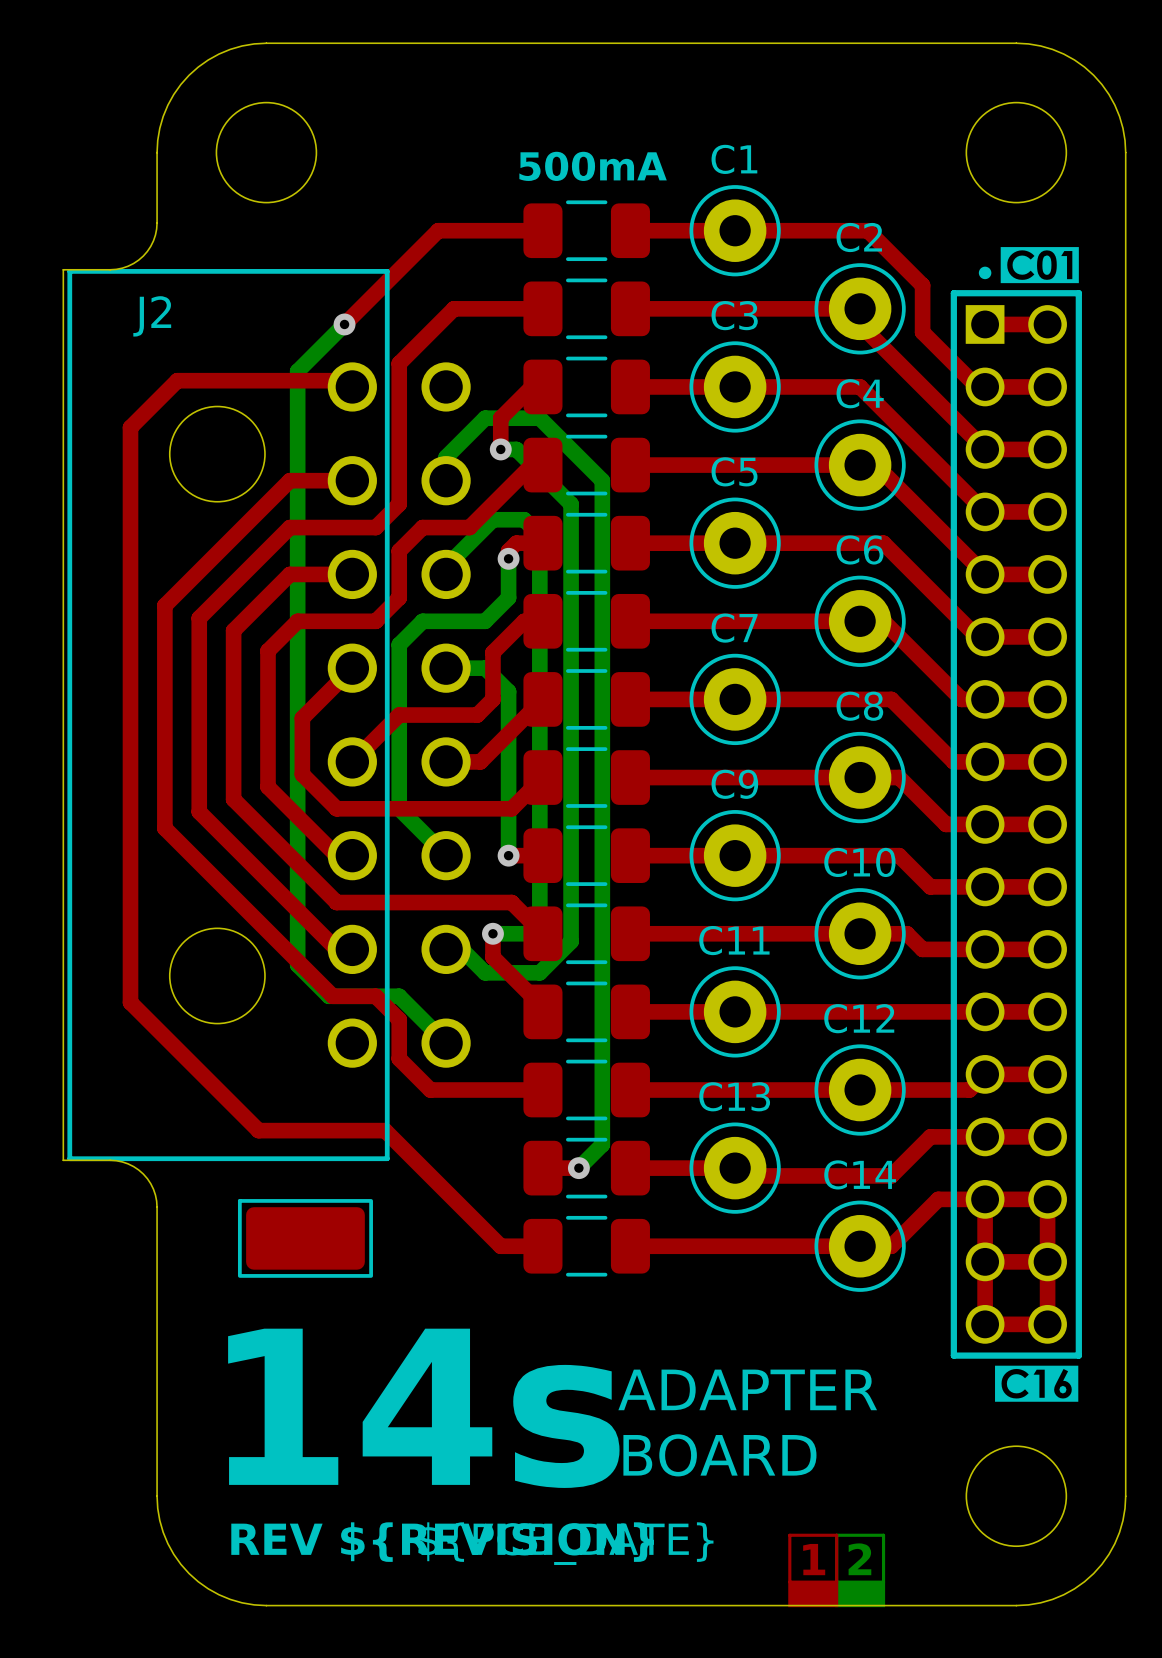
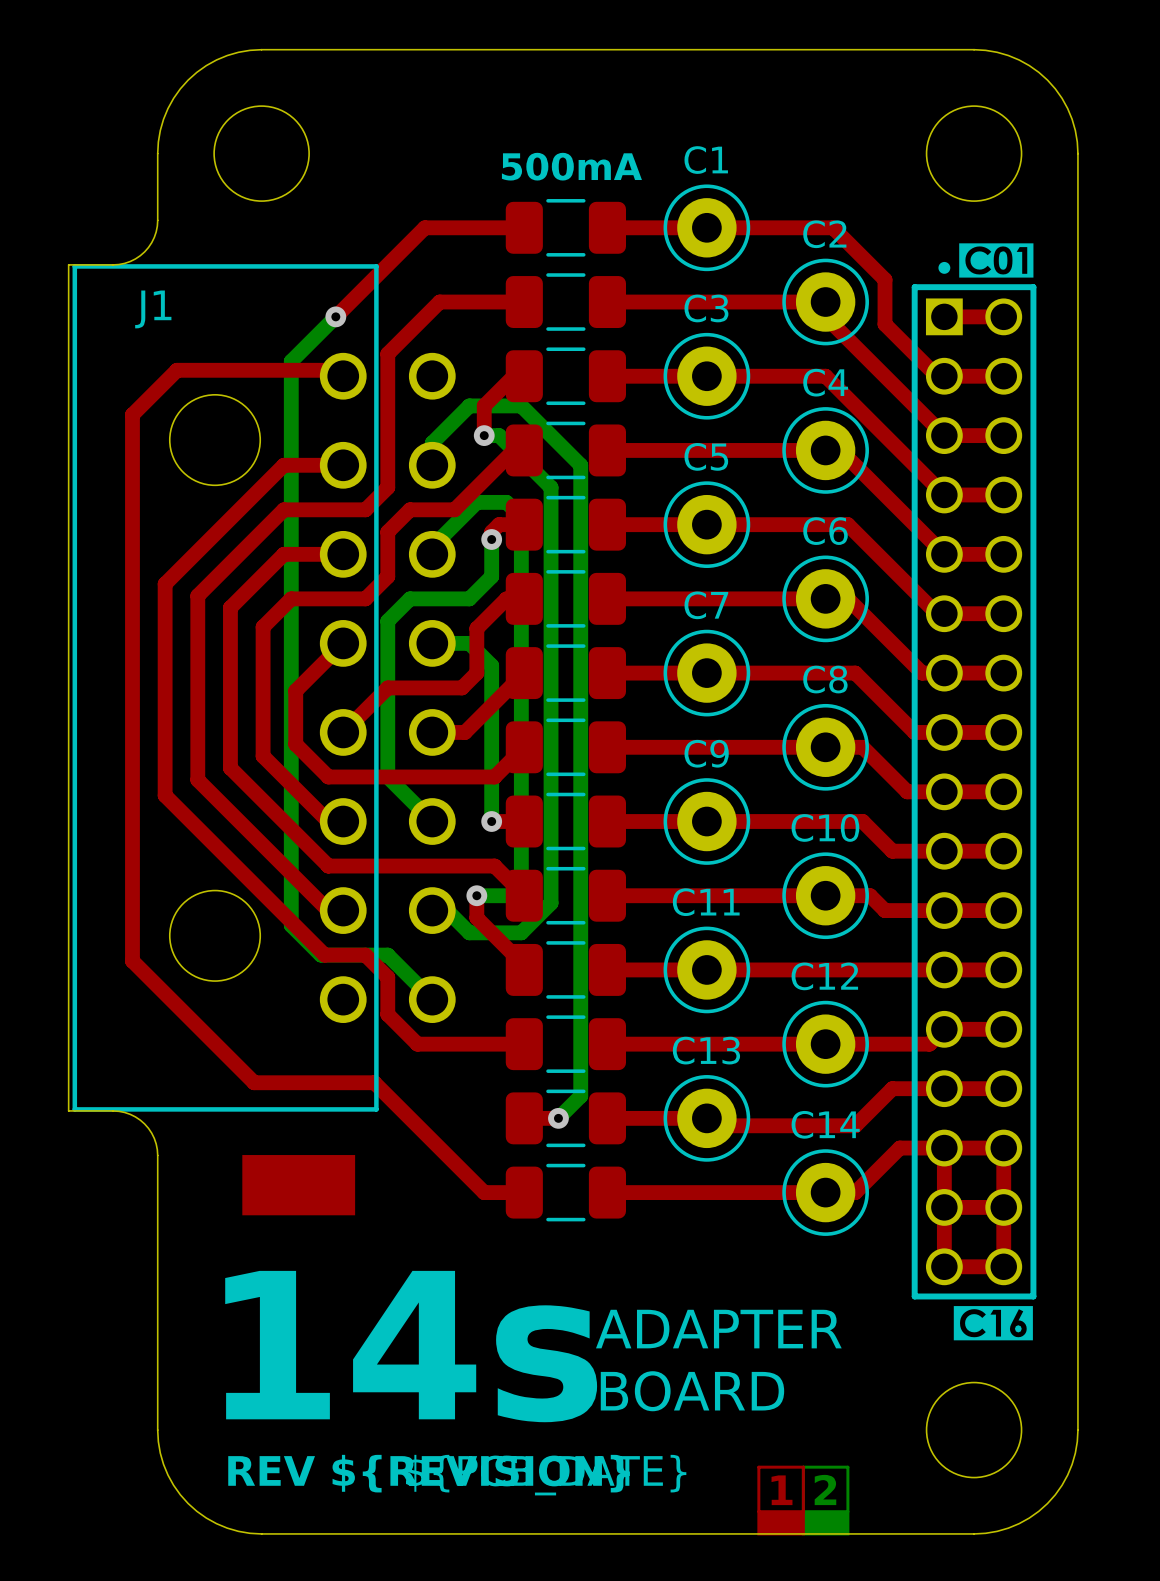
J2 name: J2 (152, 316) -> J1 (153, 309)
part footprint: [237, 1199, 373, 1278] -> [242, 1155, 356, 1216]

